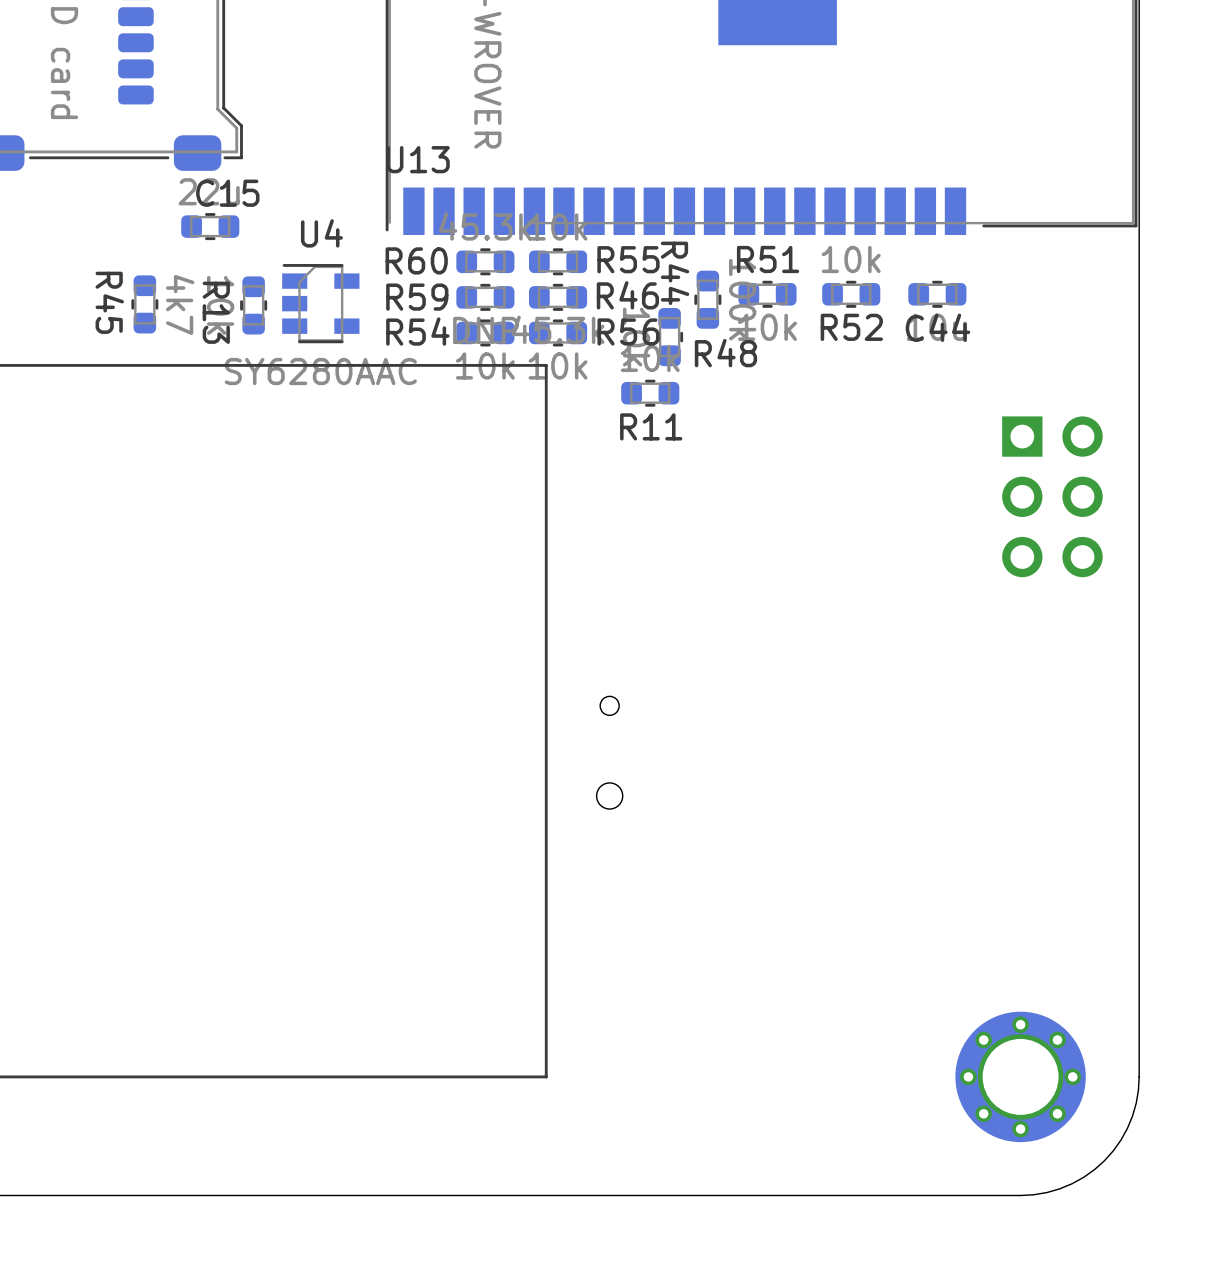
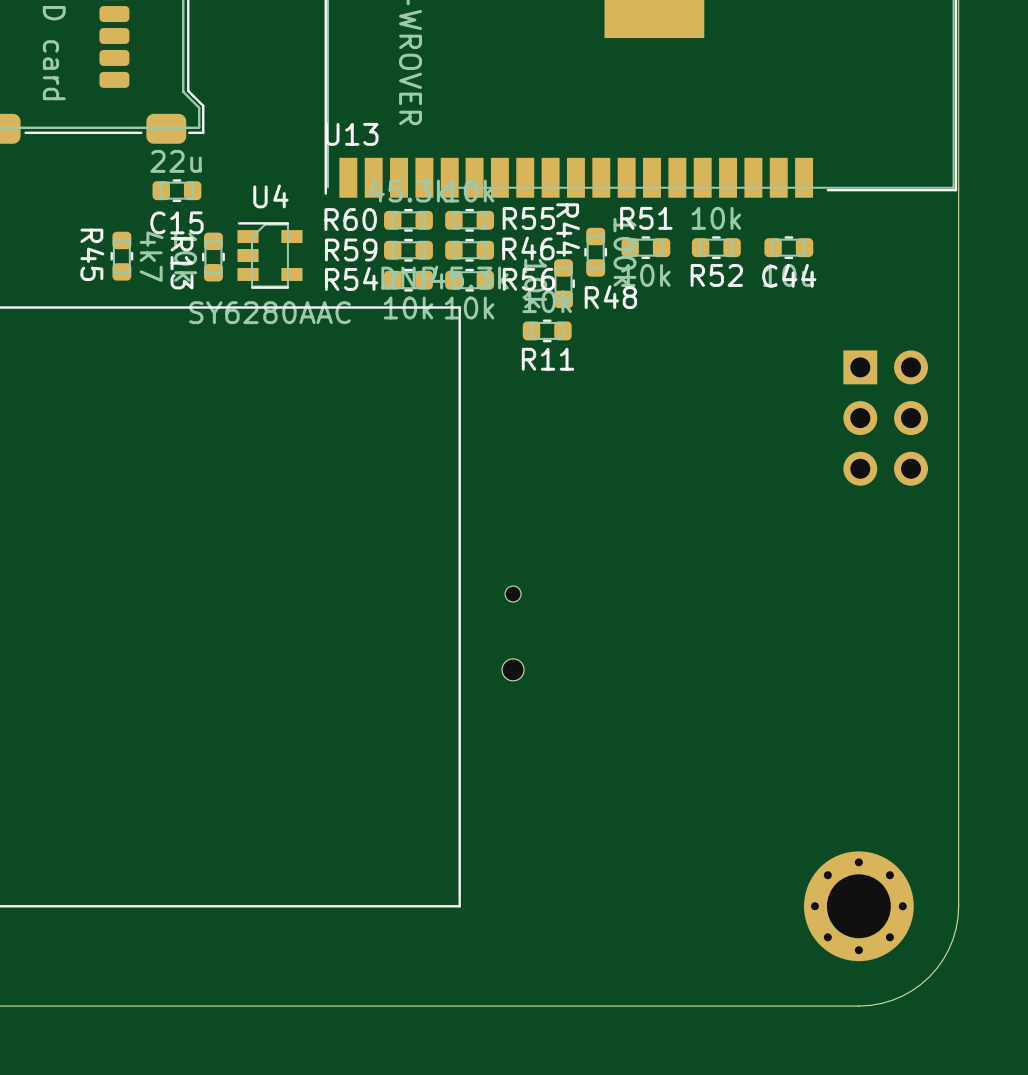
C15 name position: C15 (227, 193) -> C15 (176, 222)

